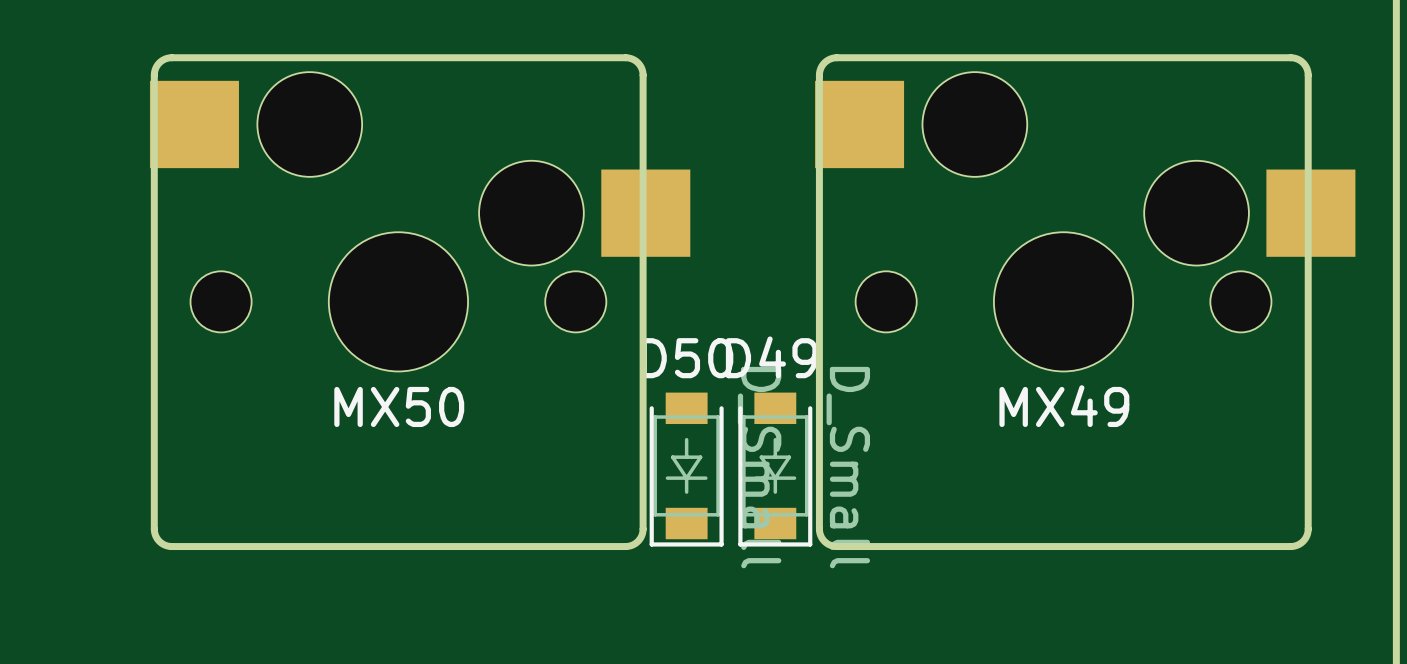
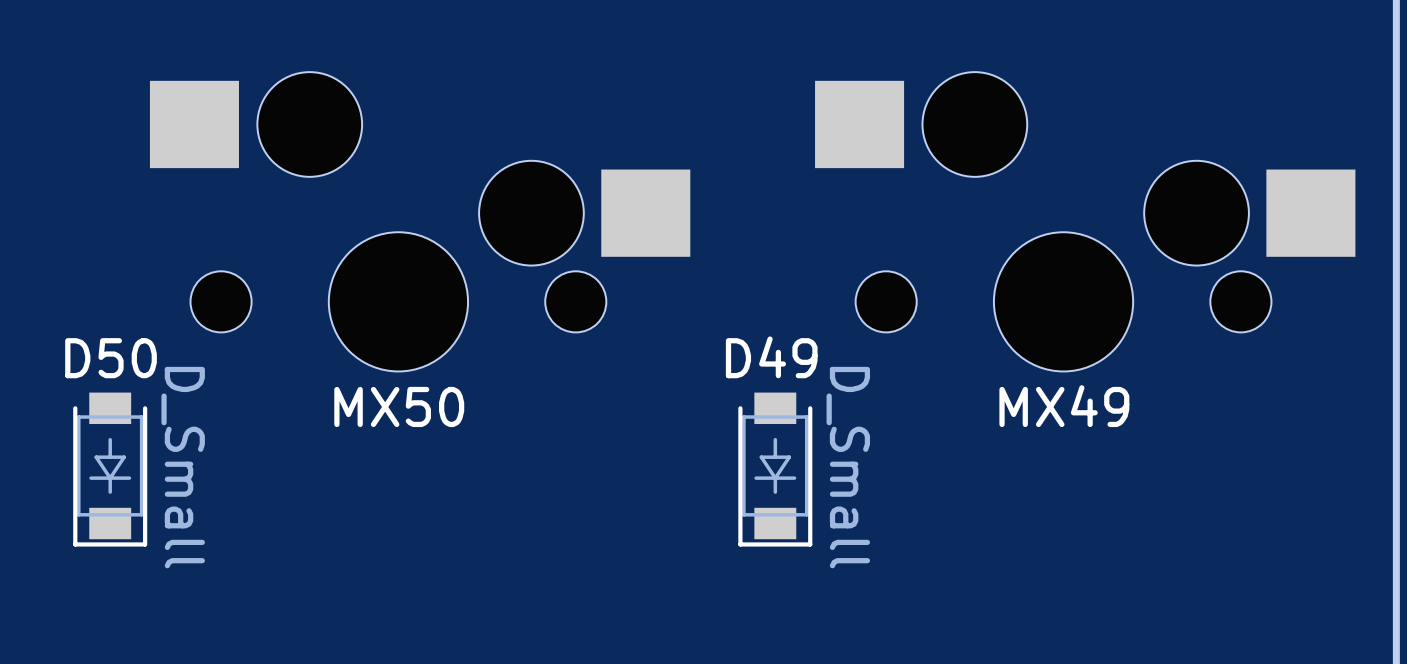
board edge: (625, 57) (171, 57) (159, 62) (154, 75) (154, 529) (159, 541) (171, 546) (625, 546) (637, 541) (643, 529) (643, 75) (637, 62) (625, 57) -> none
board edge: (1290, 57) (836, 57) (824, 62) (819, 75) (819, 529) (824, 541) (836, 546) (1290, 546) (1303, 541) (1308, 529) (1308, 75) (1303, 62) (1290, 57) -> none
D50 position: (686, 469) -> (110, 469)

